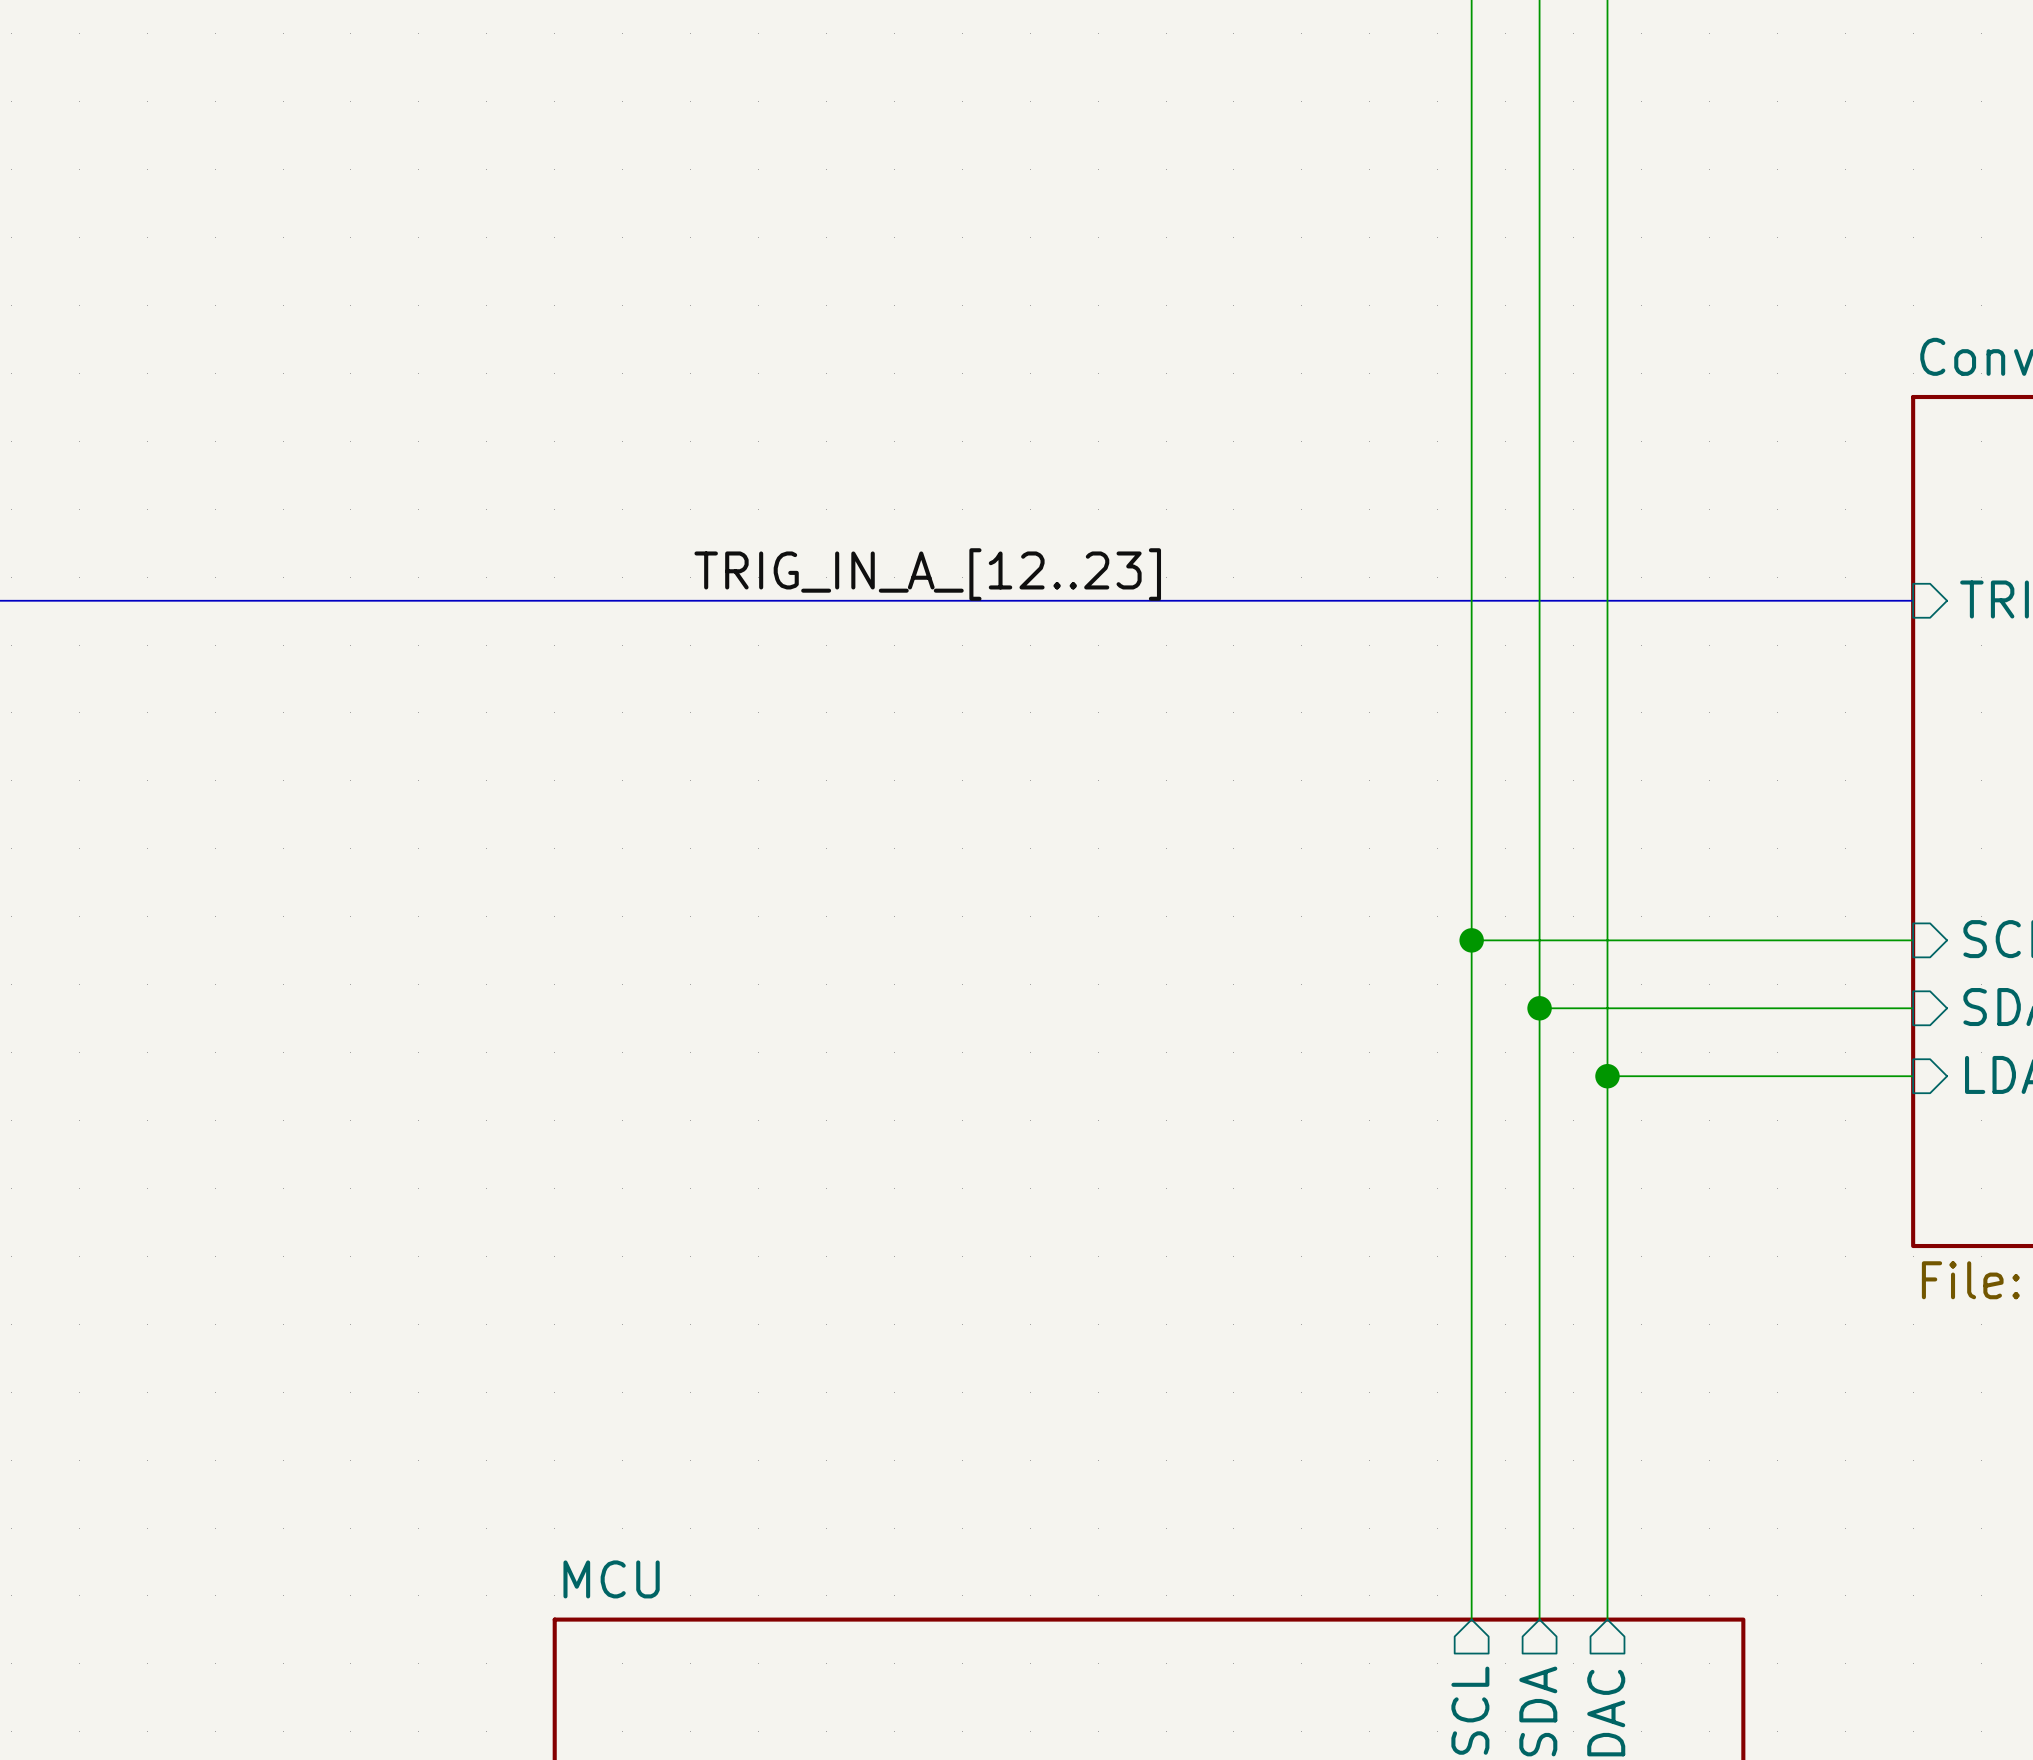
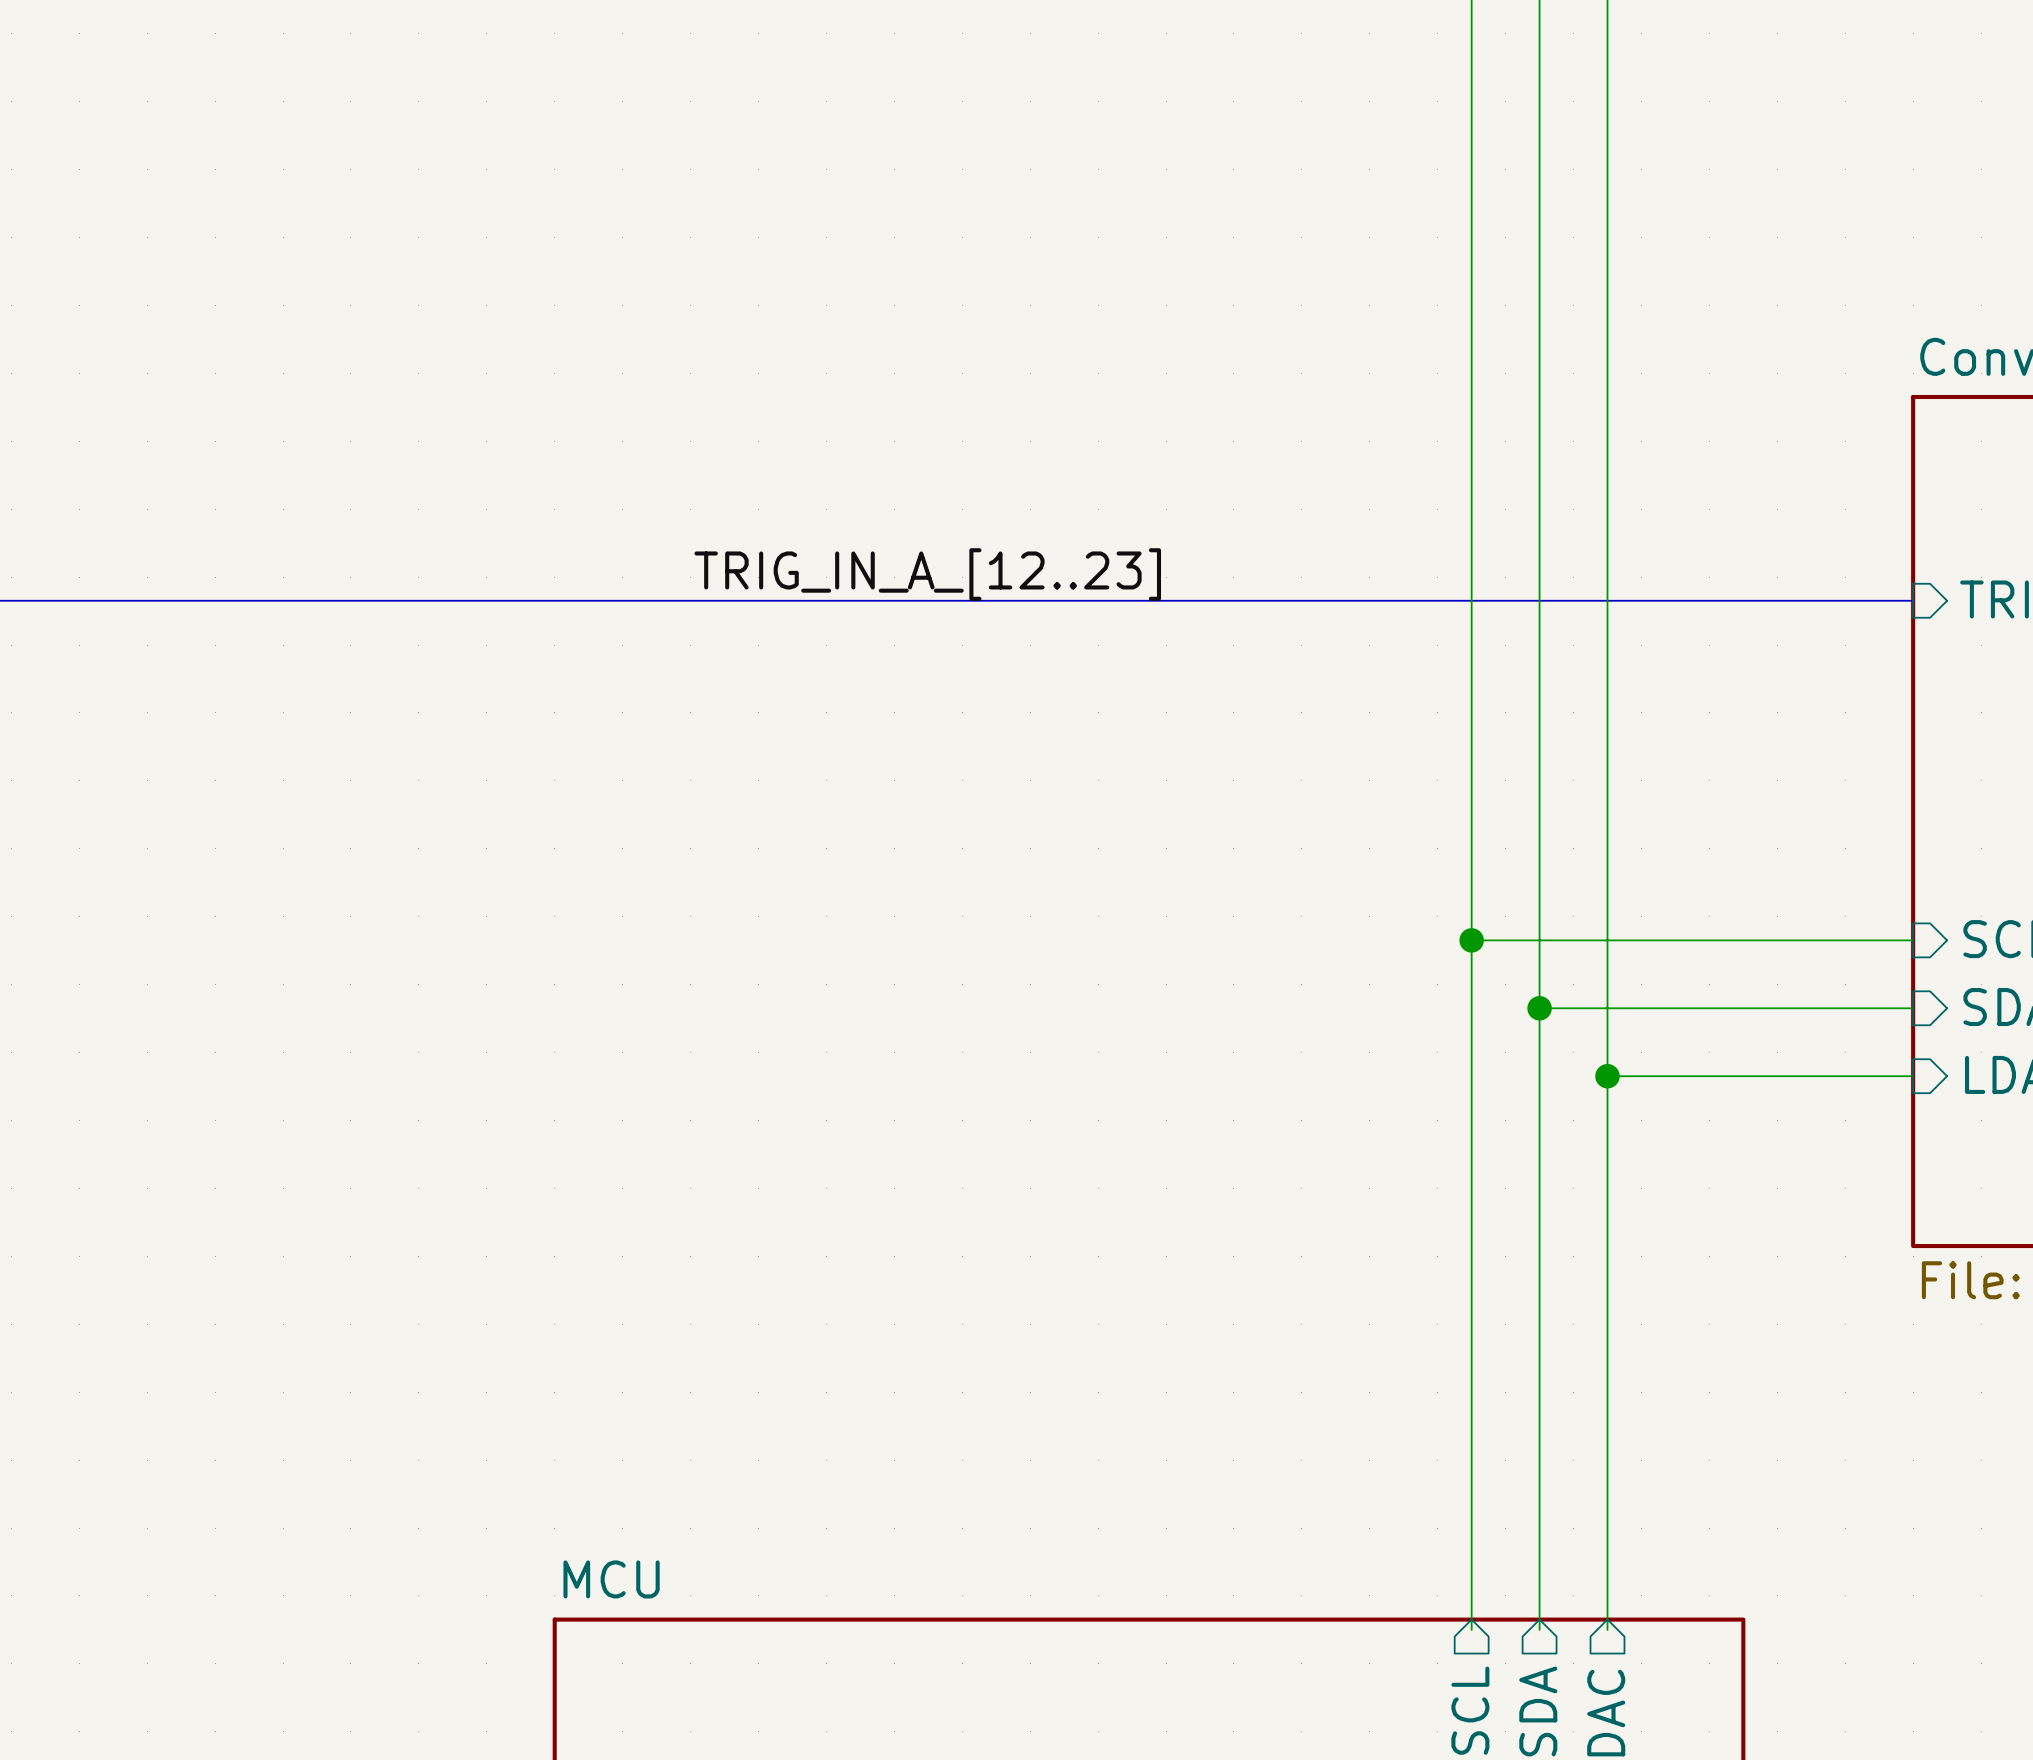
wire: none -> (1471, 1619) (1471, 1629)
wire: none -> (1539, 1619) (1539, 1629)
wire: none -> (1607, 1619) (1607, 1629)

